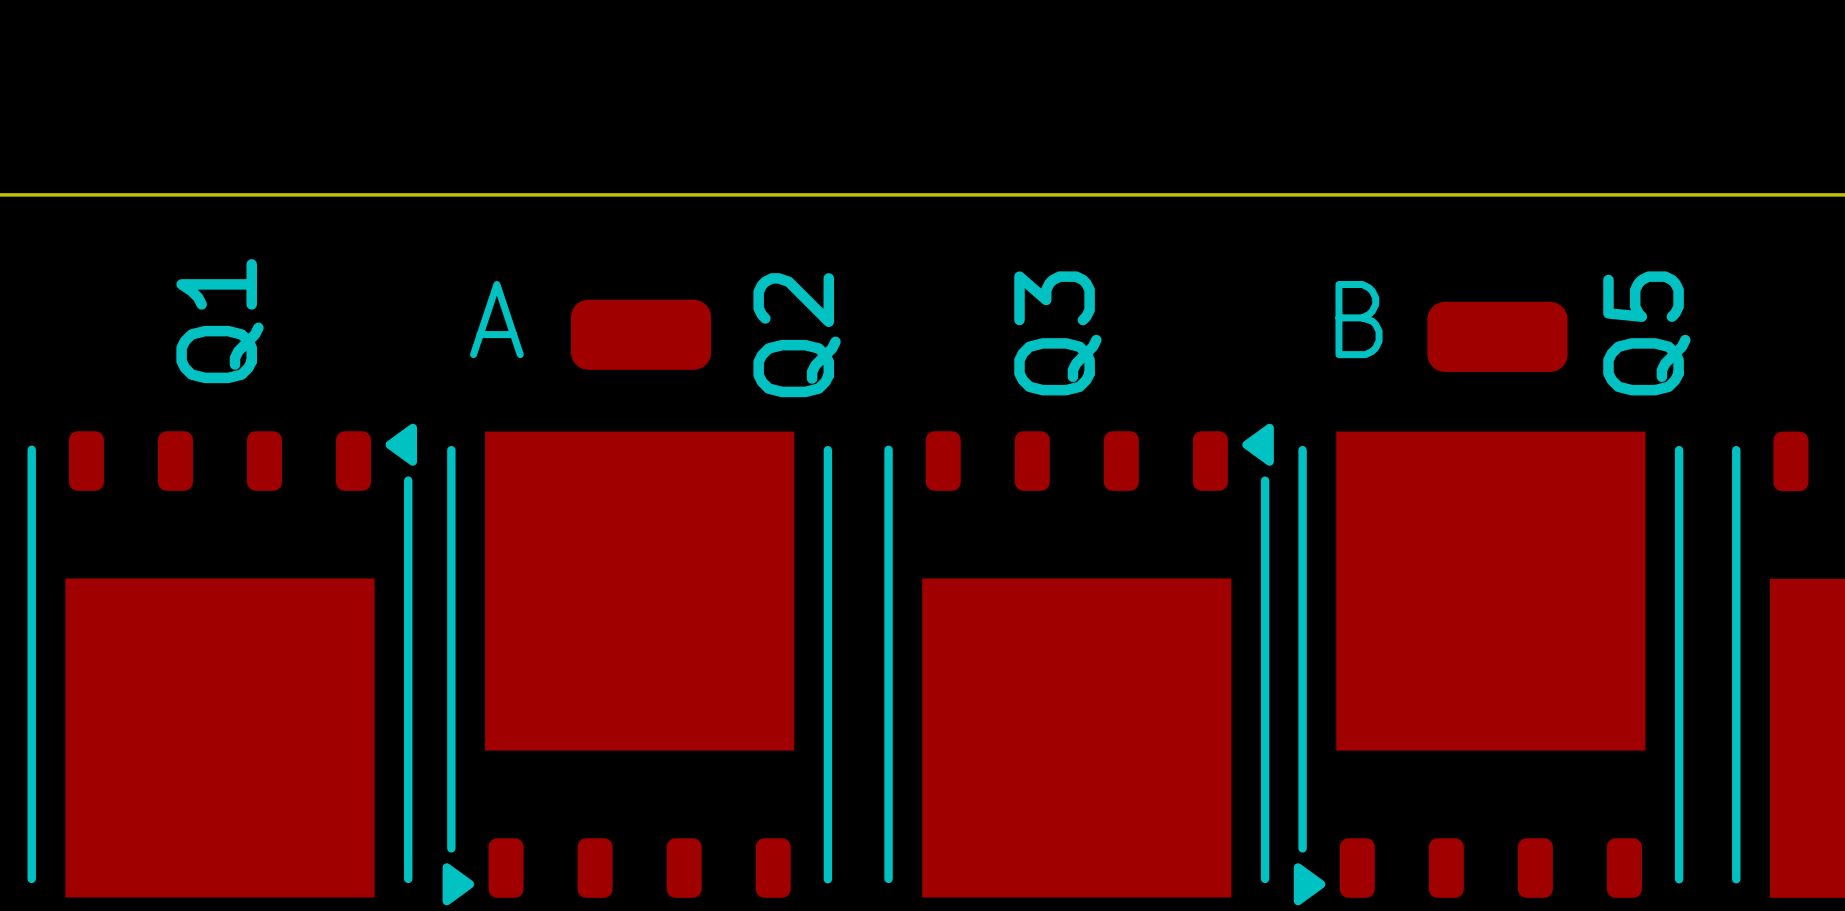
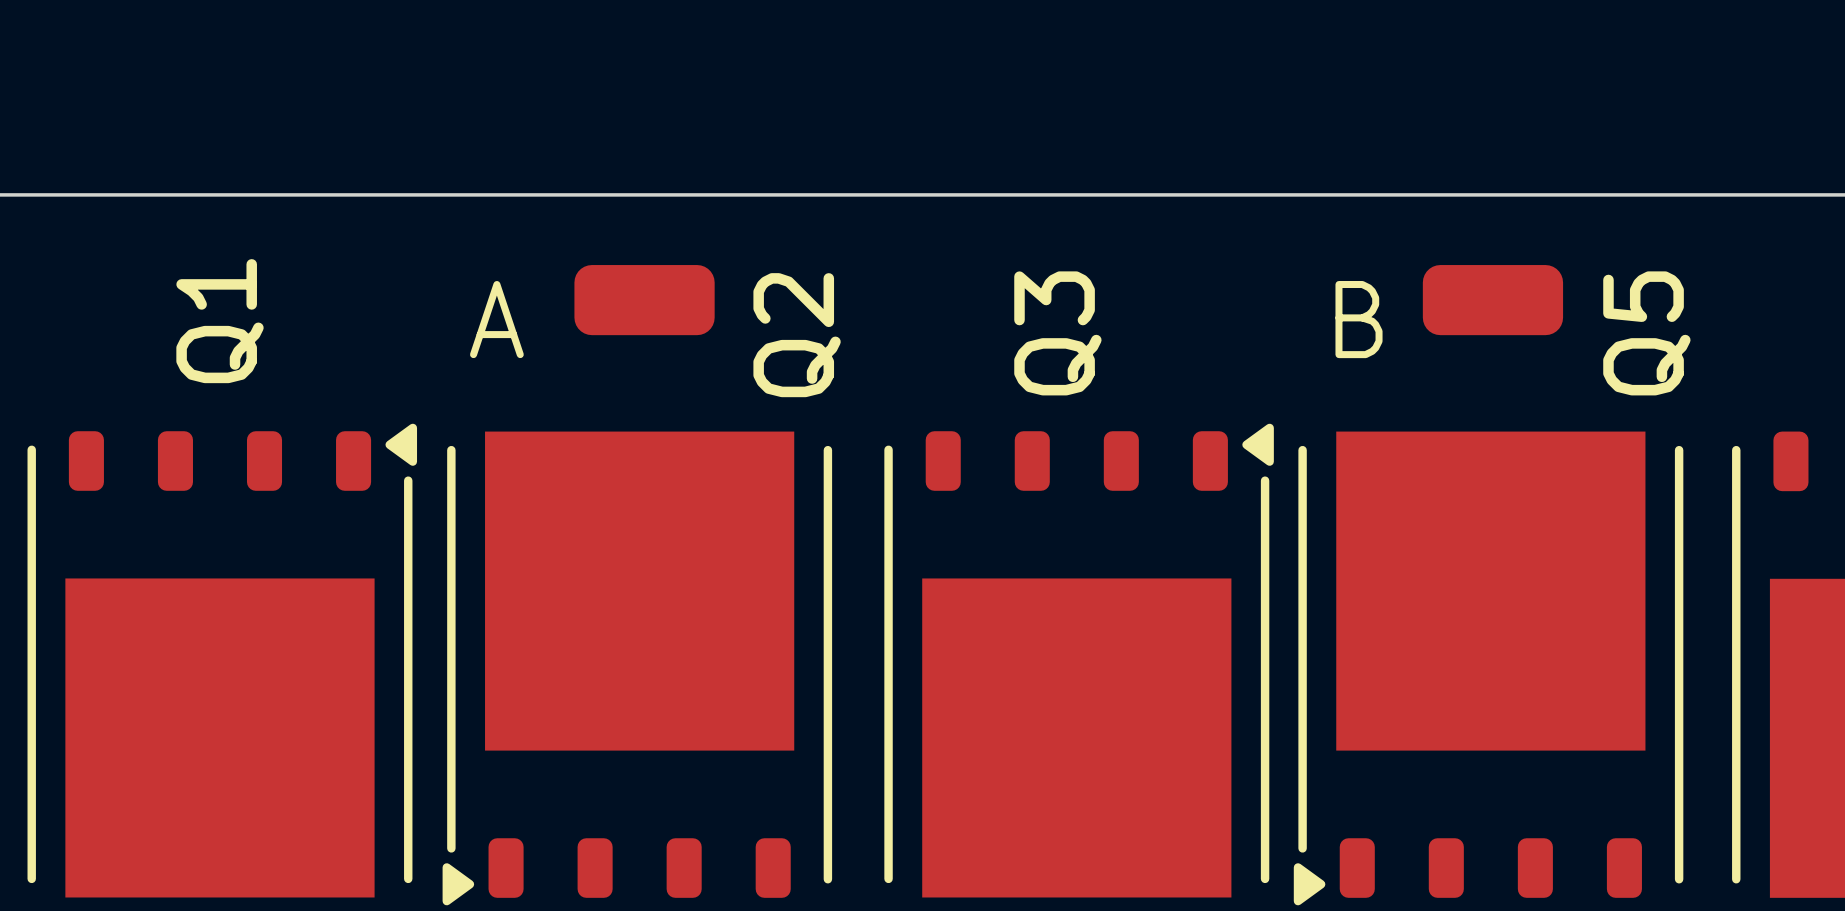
part position: (641, 334) -> (644, 300)
part position: (1497, 336) -> (1492, 300)

